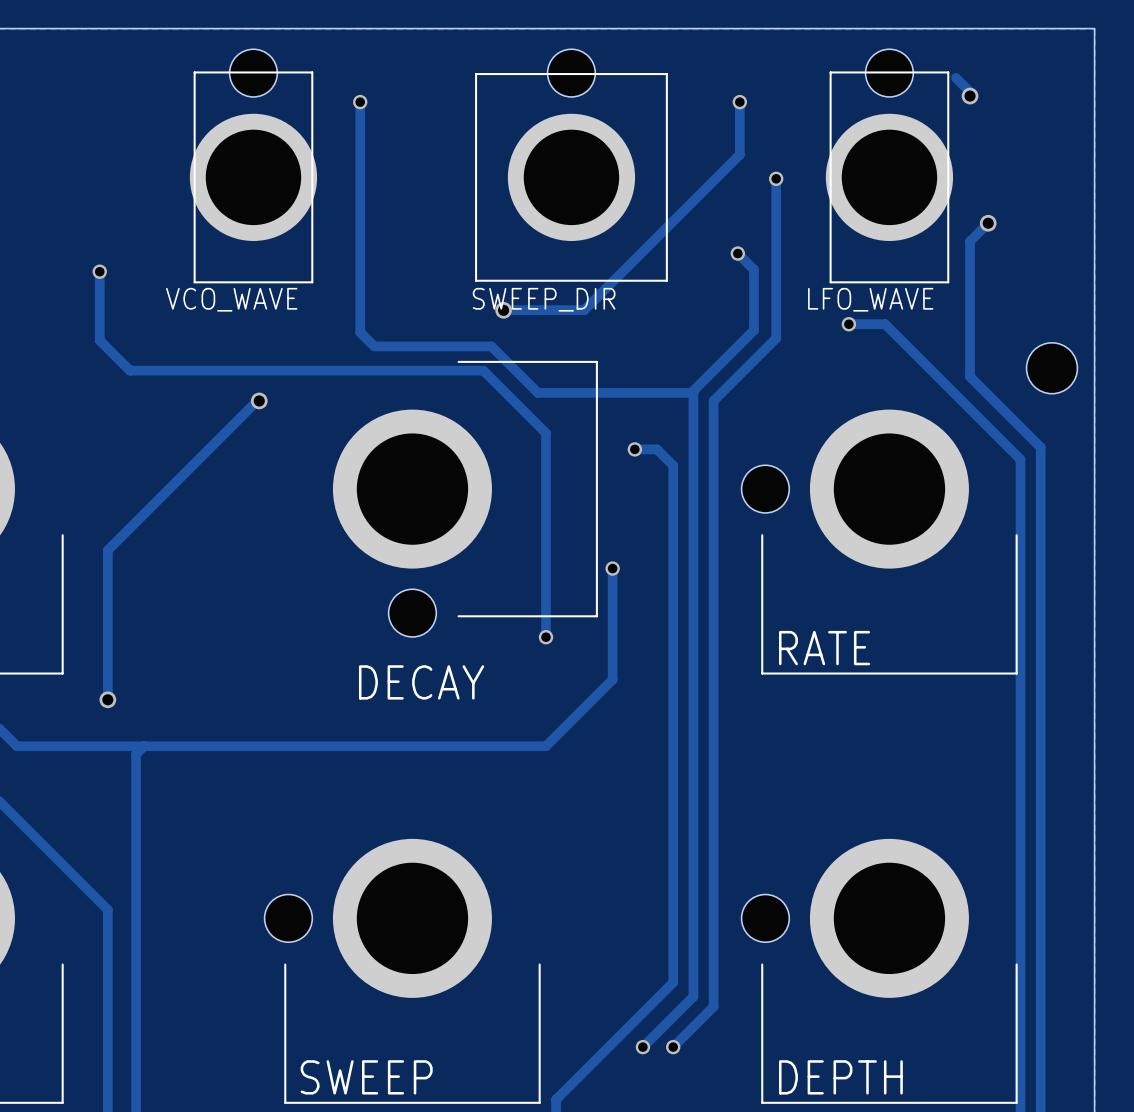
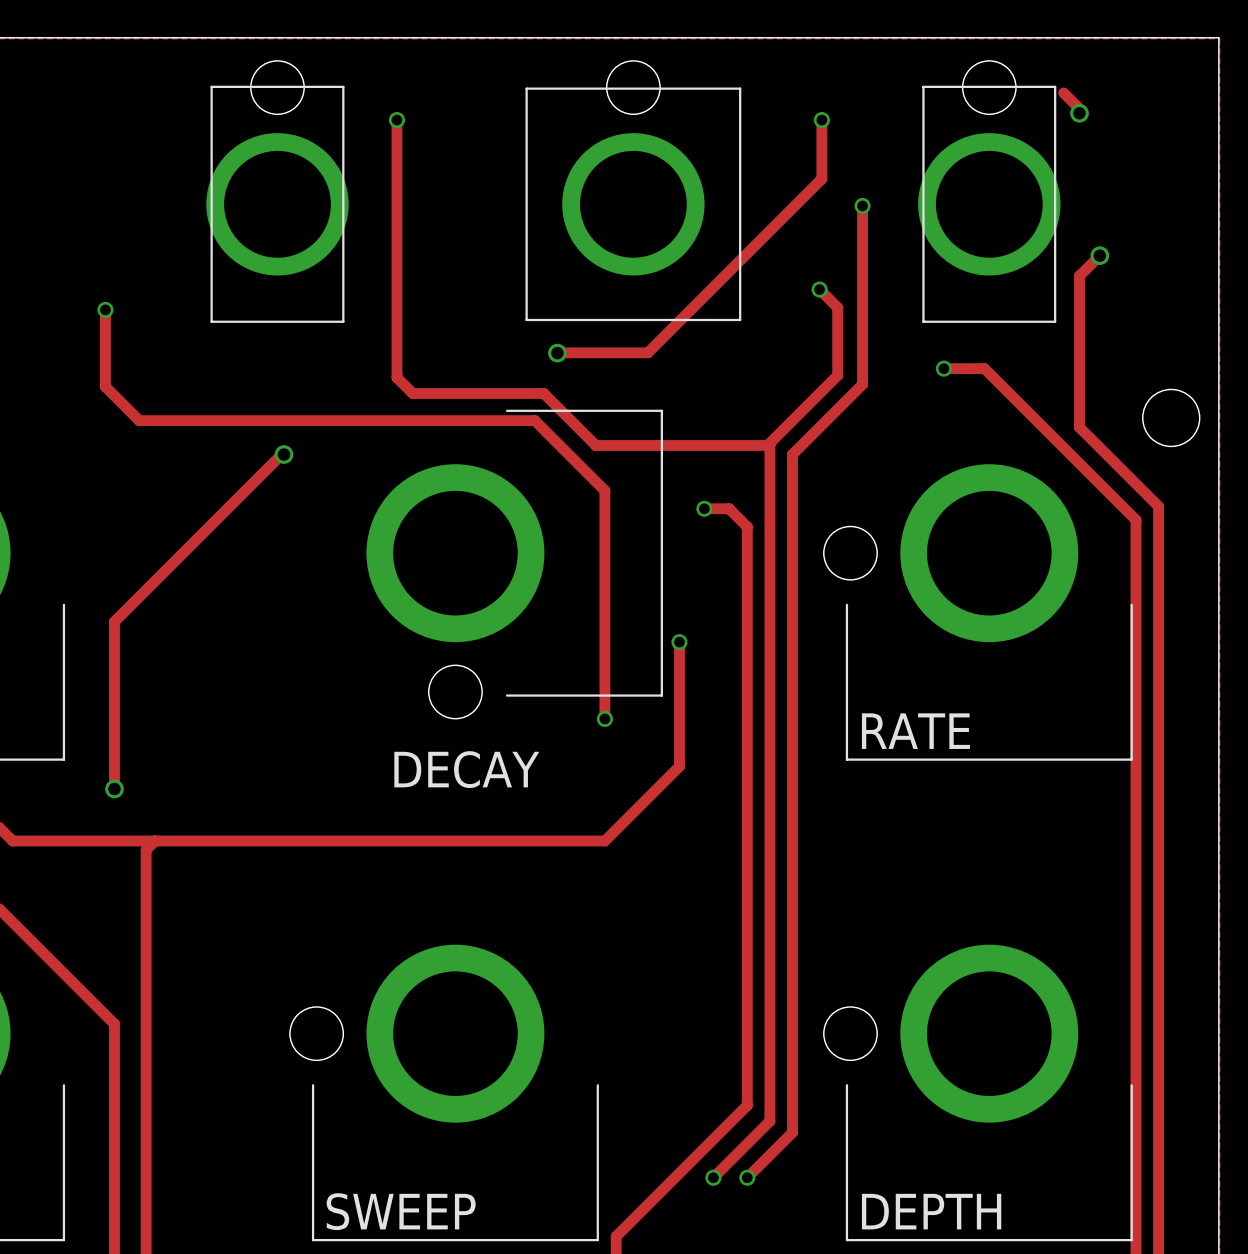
VCO_WAVE name: VCO_WAVE (231, 299) -> none
SWEEP_DIR name: SWEEP_DIR (544, 299) -> none
LFO_WAVE name: LFO_WAVE (870, 299) -> none

